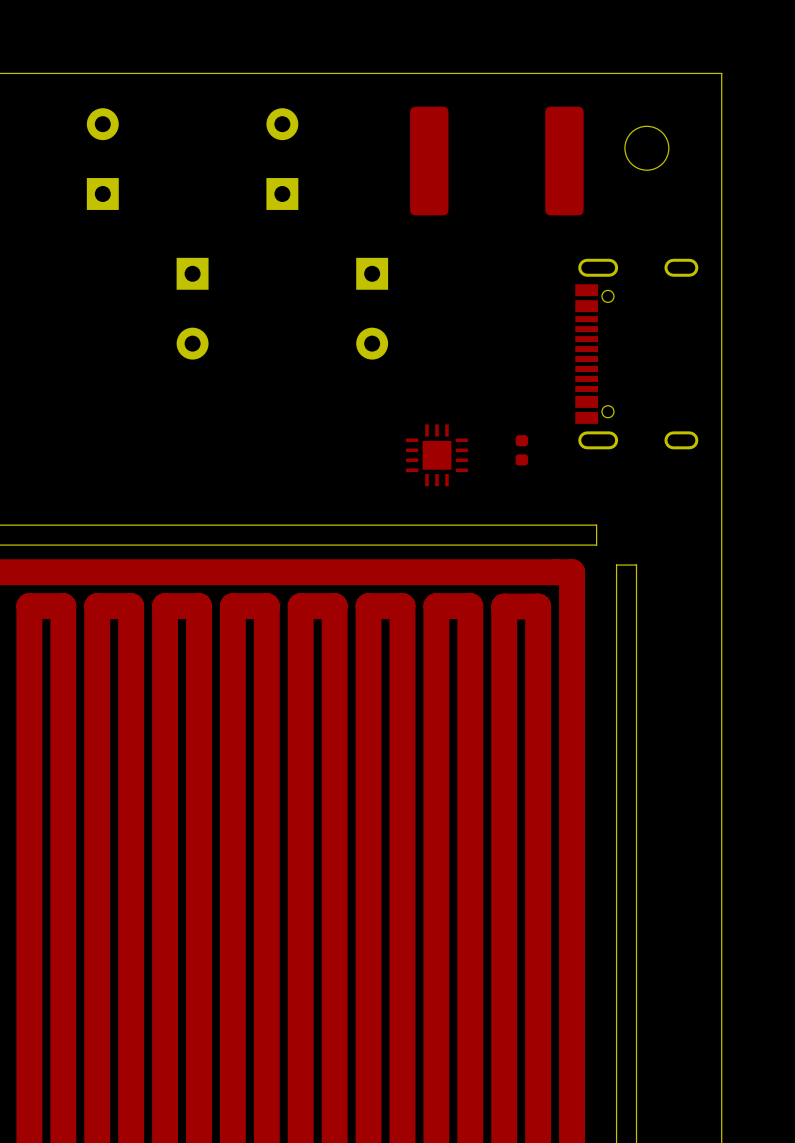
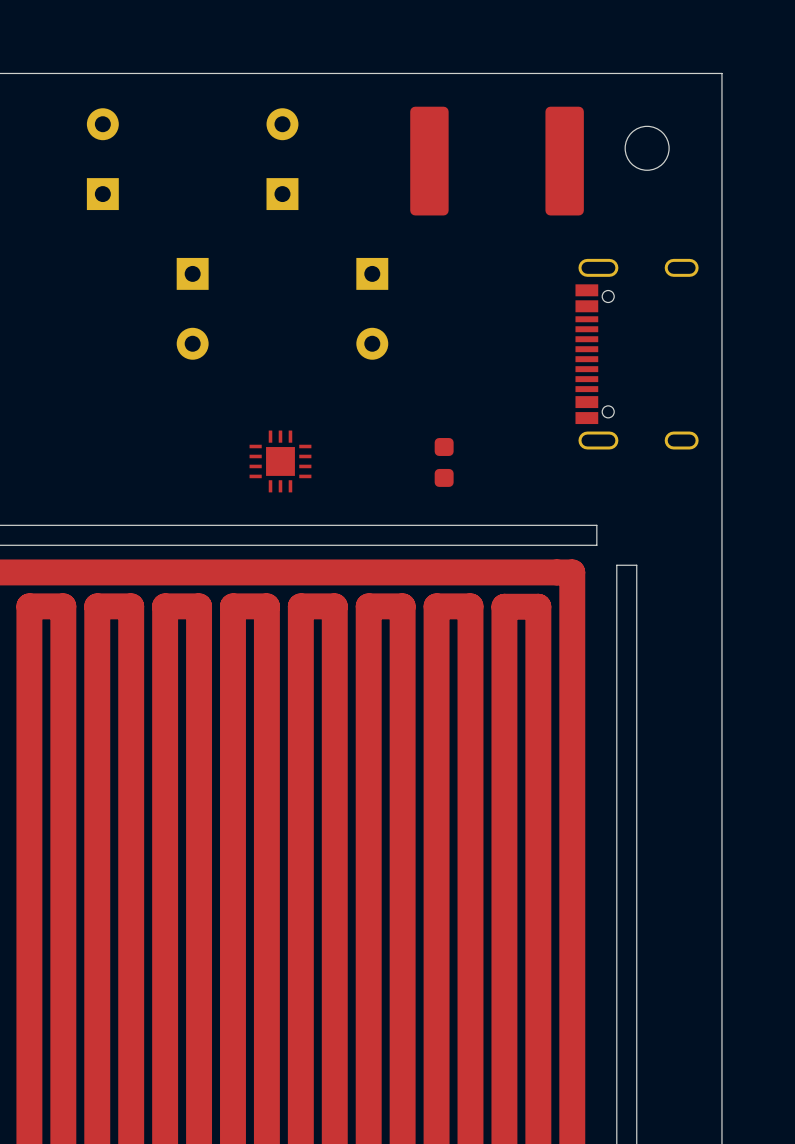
part footprint: [406, 424, 468, 487] -> [434, 438, 454, 487]
part: (521, 450) -> none
part: none -> (280, 461)

